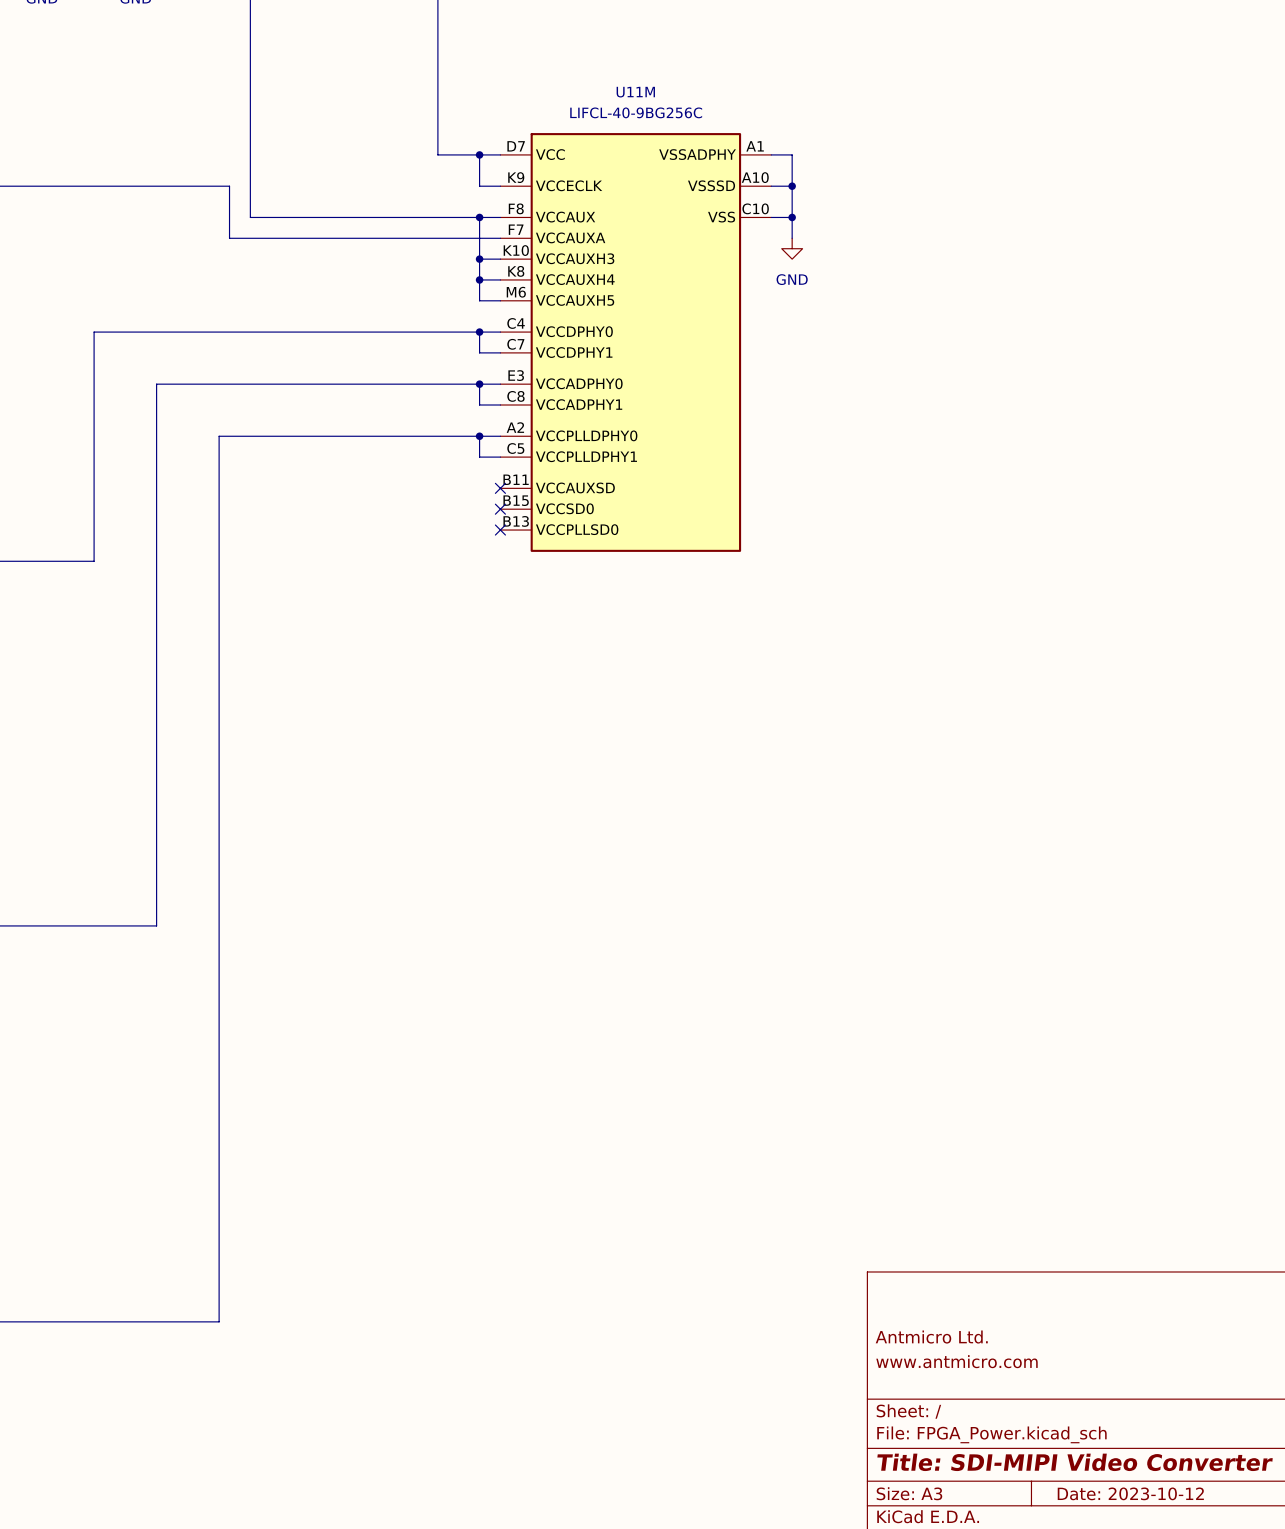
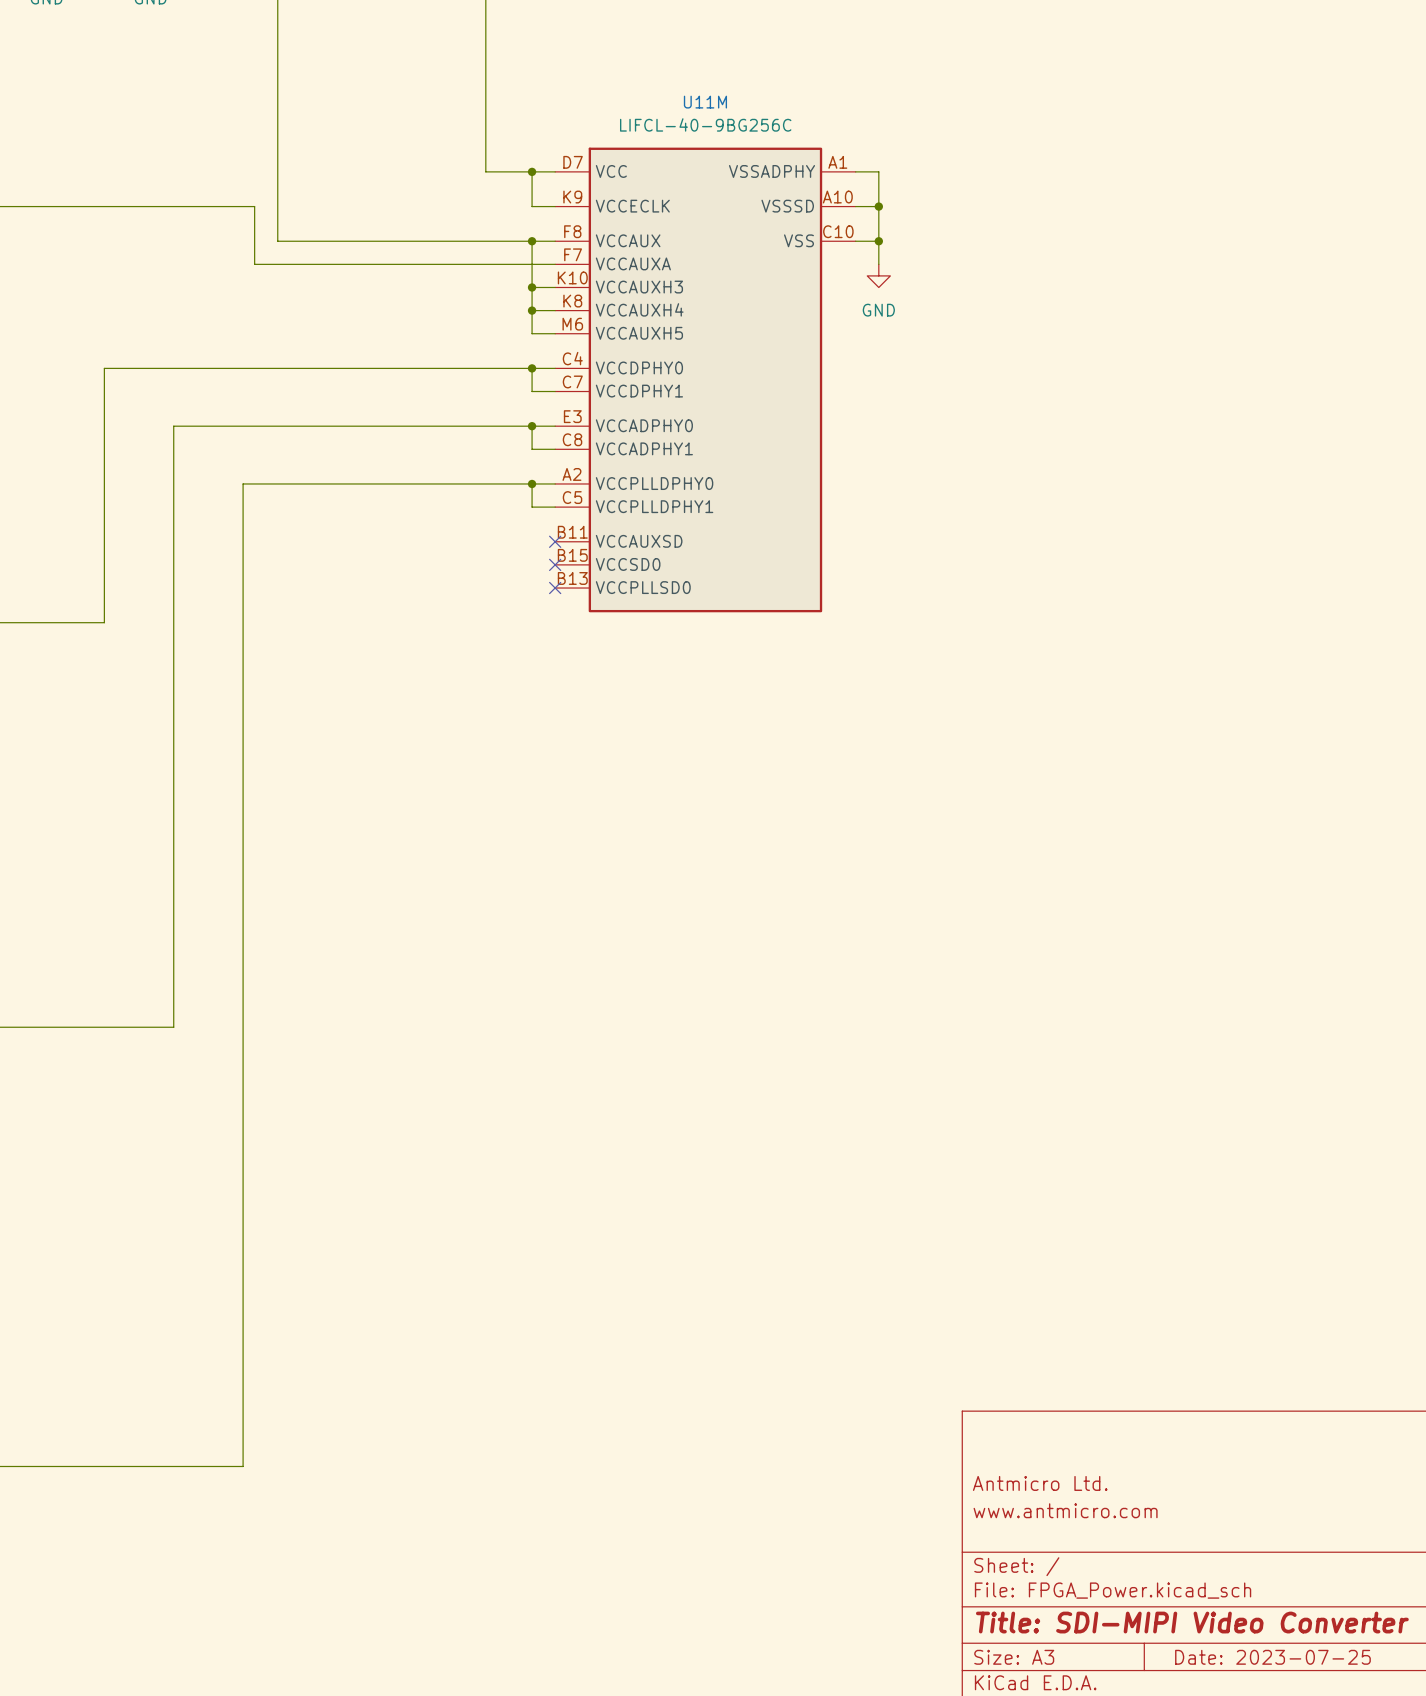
title block: Date: 2023-10-12 (1130, 1493) -> Date: 2023-07-25 (1272, 1657)

